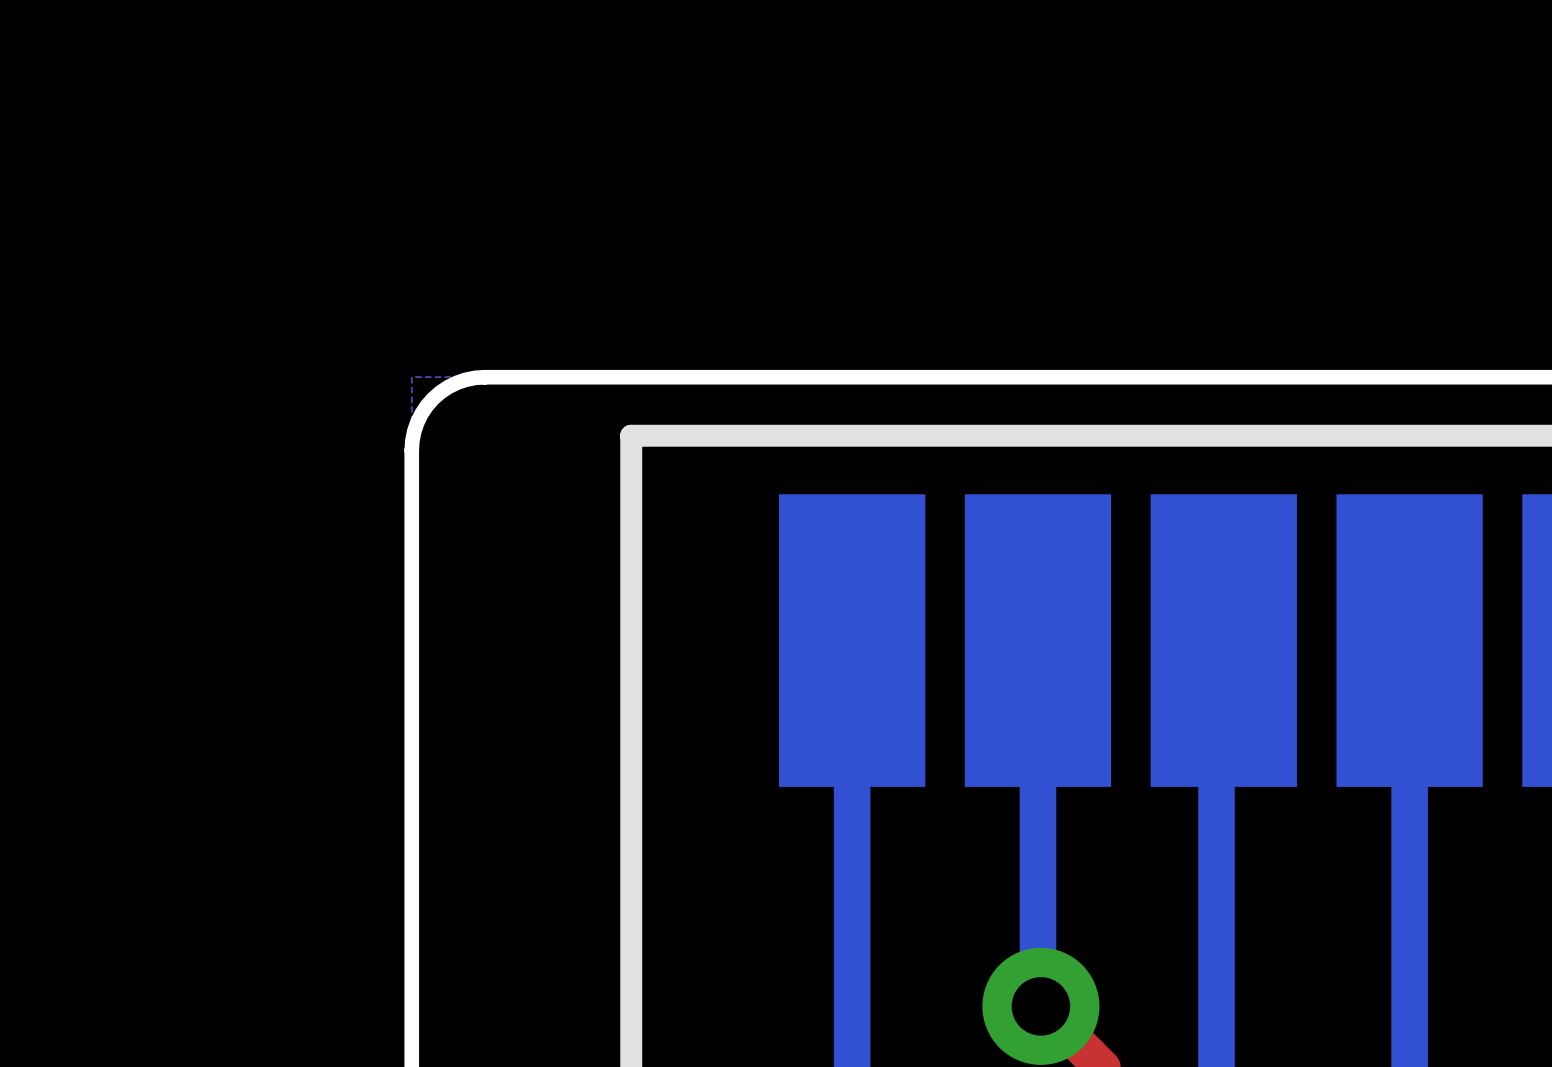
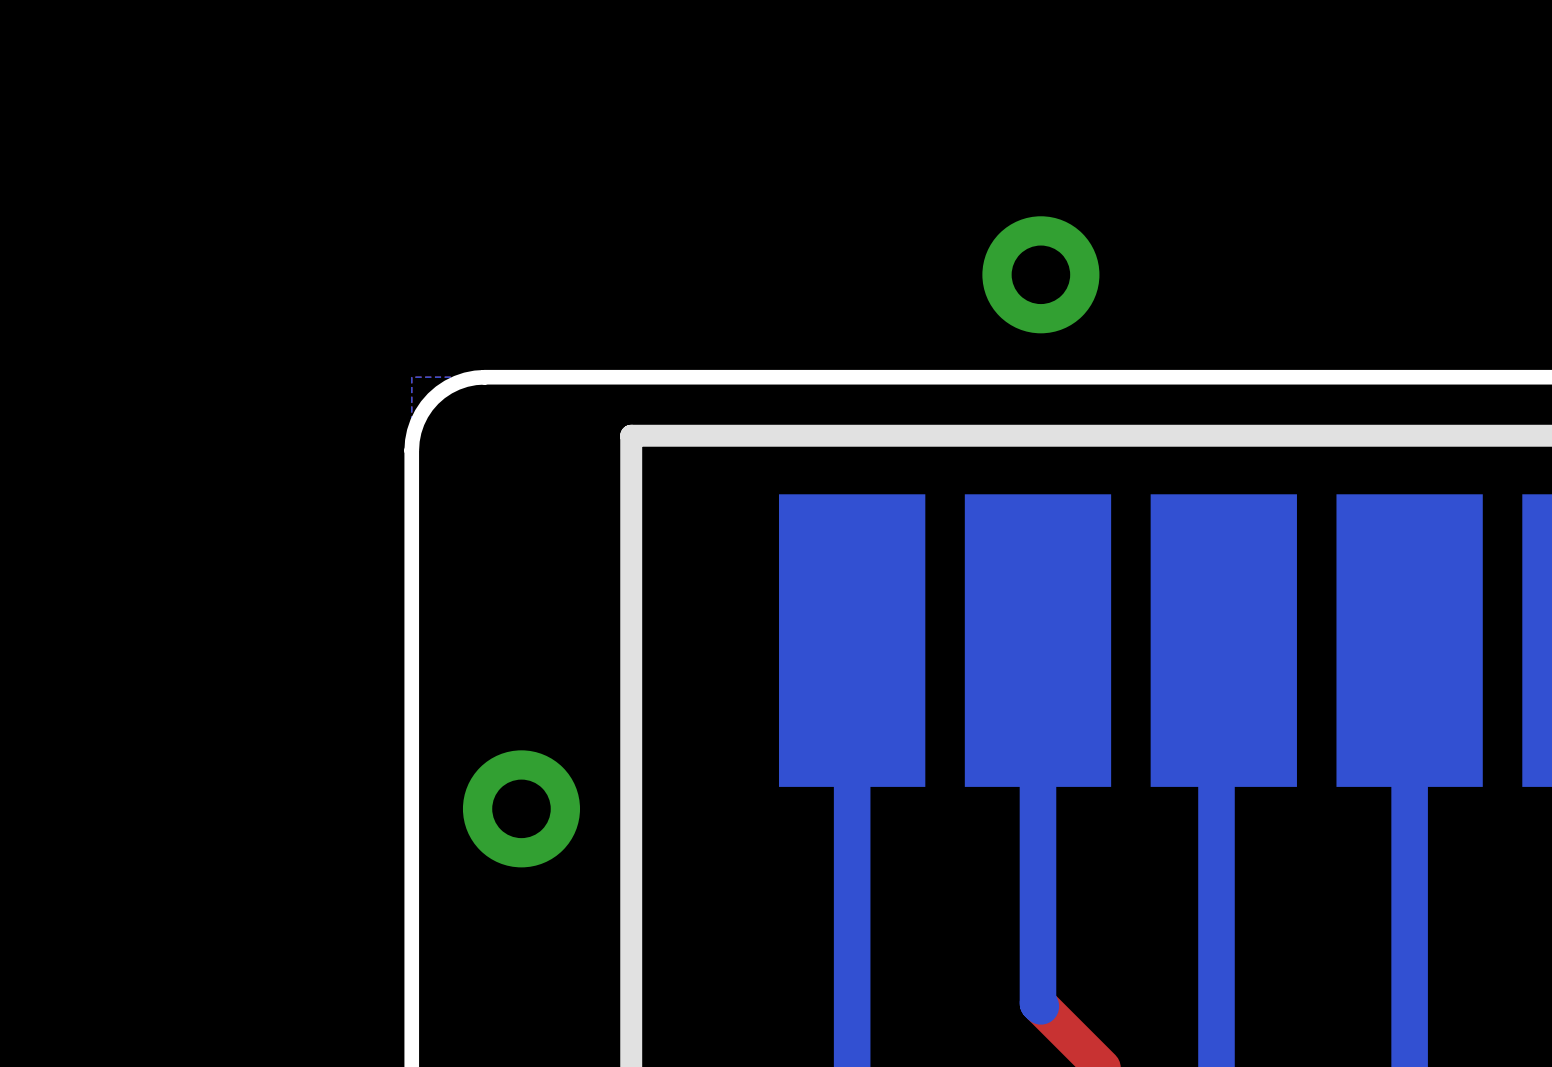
via: none -> (1040, 274)
via: none -> (521, 808)
via: (1040, 1006) -> none

